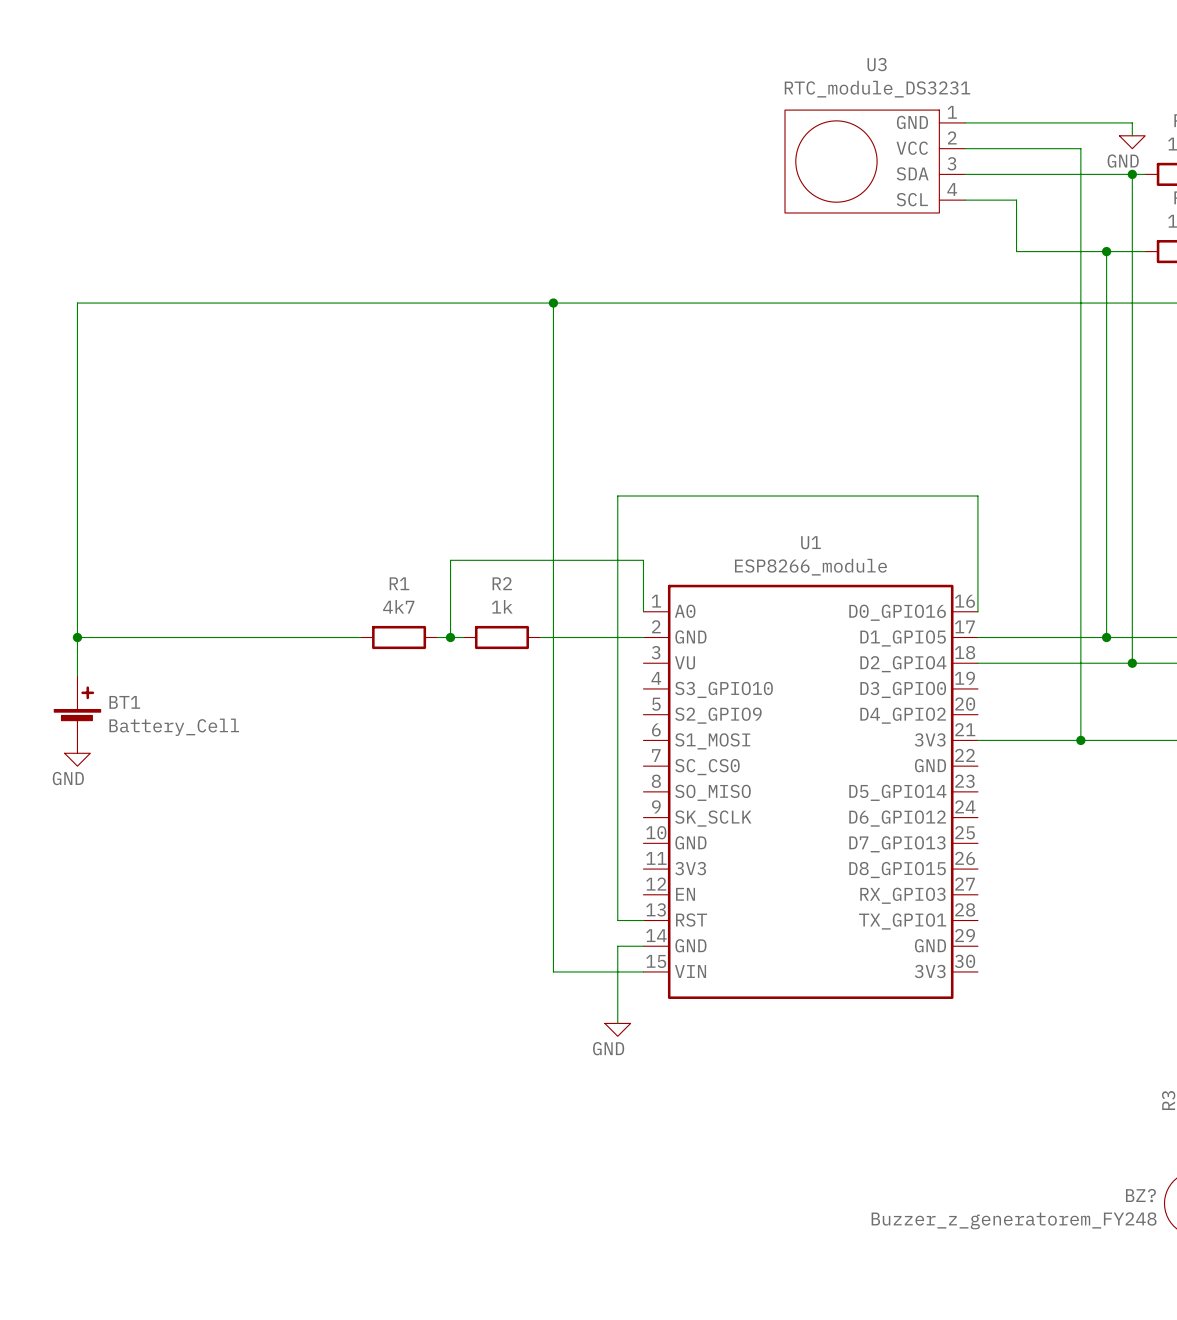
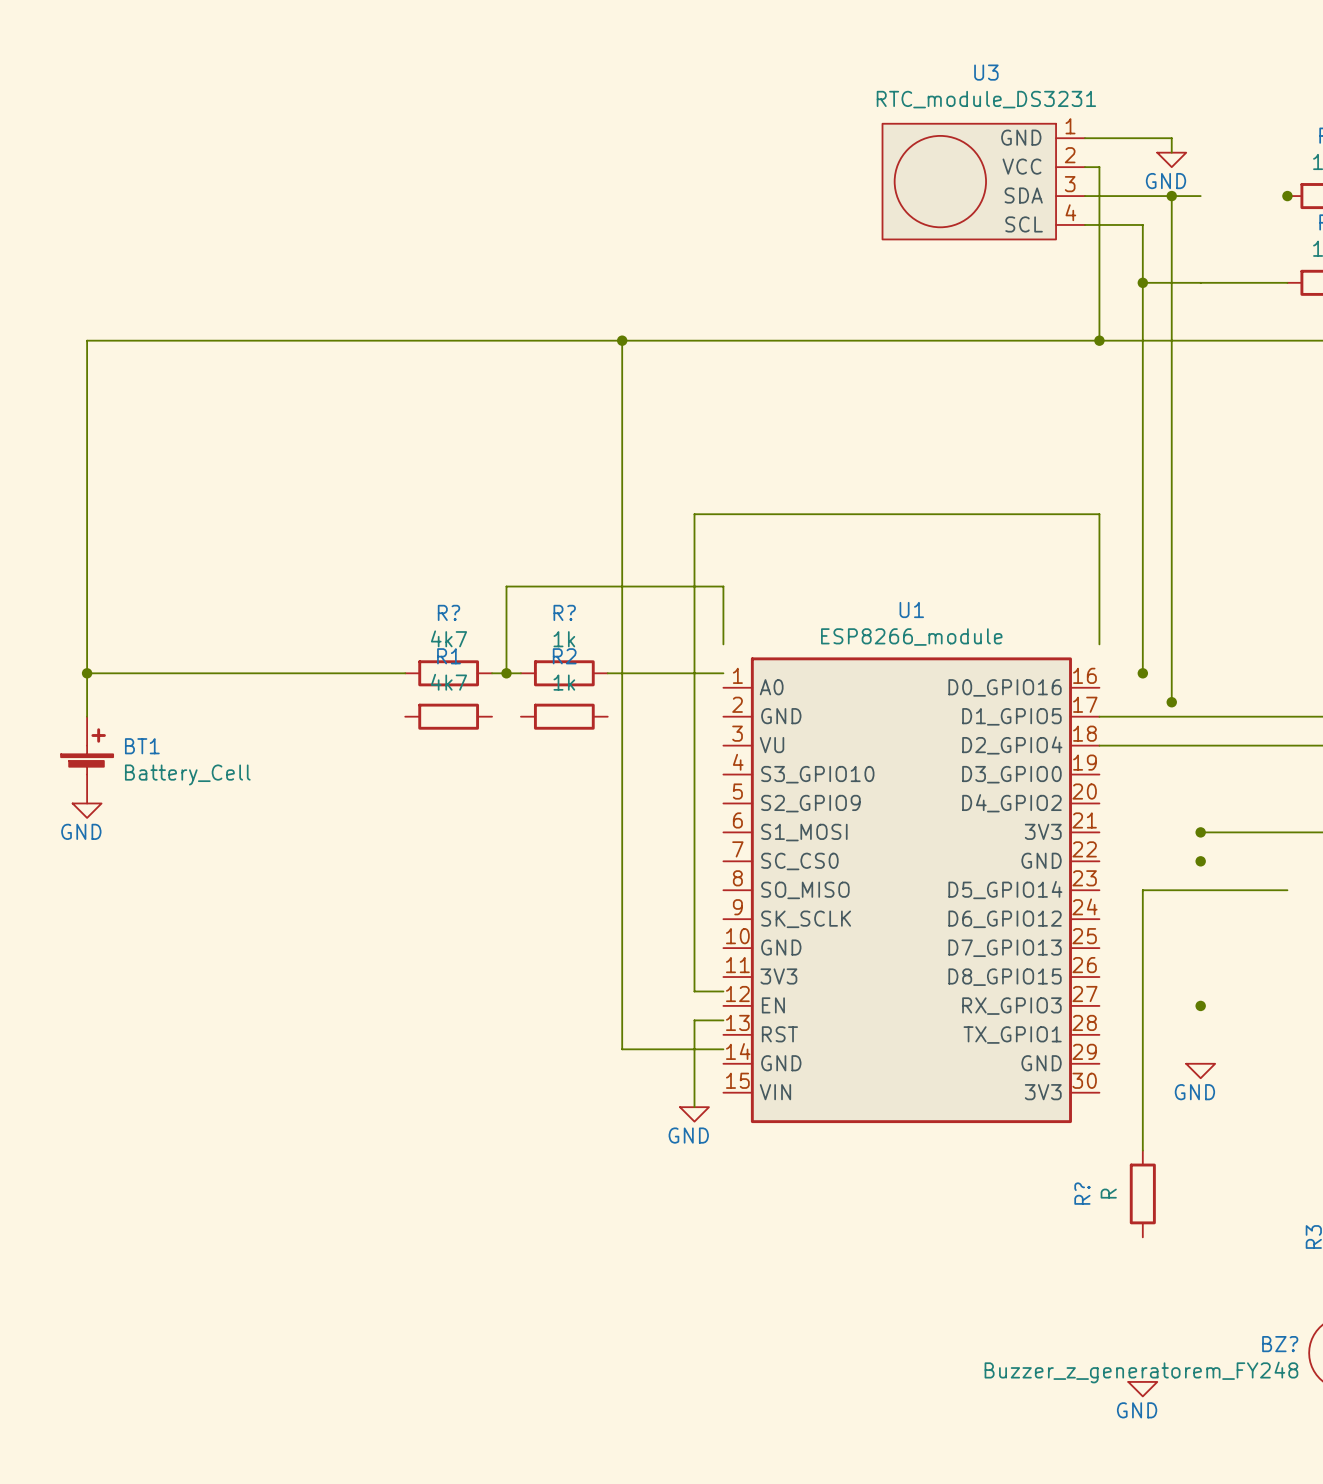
wire: (1042, 122) (1132, 122) (1132, 135) -> (1171, 138) (1171, 152)
GND position: (1132, 142) -> (1171, 159)
wire: (977, 148) (1080, 148) (1080, 740) -> (1099, 167) (1099, 340)
wire: none -> (1171, 196) (1171, 702)
junction: none -> (1171, 196)
wire: (1068, 174) (1145, 174) -> none
wire: (1132, 174) (1132, 663) -> none
junction position: (1132, 174) -> (1287, 196)
wire: none -> (1142, 282) (1142, 673)
junction: none -> (1142, 282)
wire: (1106, 251) (1106, 637) -> none
junction: (1106, 251) -> none
junction: none -> (1099, 340)
wire: (617, 496) (977, 496) -> (694, 557) (694, 514) (1099, 514) (1099, 557)
wire: (450, 560) (643, 560) -> (506, 629) (506, 586) (723, 586) (723, 629)
wire: (643, 573) (643, 611) -> none
wire: (977, 573) (977, 611) -> none
wire: none -> (87, 673) (405, 673)
R?: none -> 4k7 (448, 673)
wire: (450, 598) (450, 637) -> none
R?: none -> 1k (564, 673)
junction: none -> (1142, 673)
junction: none -> (1171, 702)
junction position: (77, 637) -> (87, 673)
wire: (360, 637) (77, 637) (77, 676) -> none
wire: (437, 637) (463, 637) -> (492, 673) (520, 673)
junction position: (450, 637) -> (506, 673)
wire: (540, 637) (643, 637) -> (607, 673) (723, 673)
junction: (1106, 637) -> none
junction: (1132, 663) -> none
BT1 position: (77, 714) -> (87, 760)
wire: (977, 740) (1068, 740) -> none
junction position: (1080, 740) -> (1200, 832)
GND position: (77, 759) -> (87, 810)
junction: none -> (1200, 861)
wire: none -> (1287, 890) (1142, 890) (1142, 1150)
wire: (617, 881) (617, 907) -> (694, 991) (723, 991)
junction: none -> (1200, 1005)
wire: (617, 920) (643, 920) -> (694, 1034) (694, 1063)
wire: (553, 933) (553, 971) (643, 971) -> (622, 1049) (723, 1049)
wire: (617, 946) (643, 946) -> (694, 1020) (723, 1020)
GND: none -> (1200, 1071)
wire: (617, 984) (617, 1023) -> none
GND position: (617, 1029) -> (694, 1114)
R?: none -> R (1142, 1193)
GND: none -> (1142, 1389)

